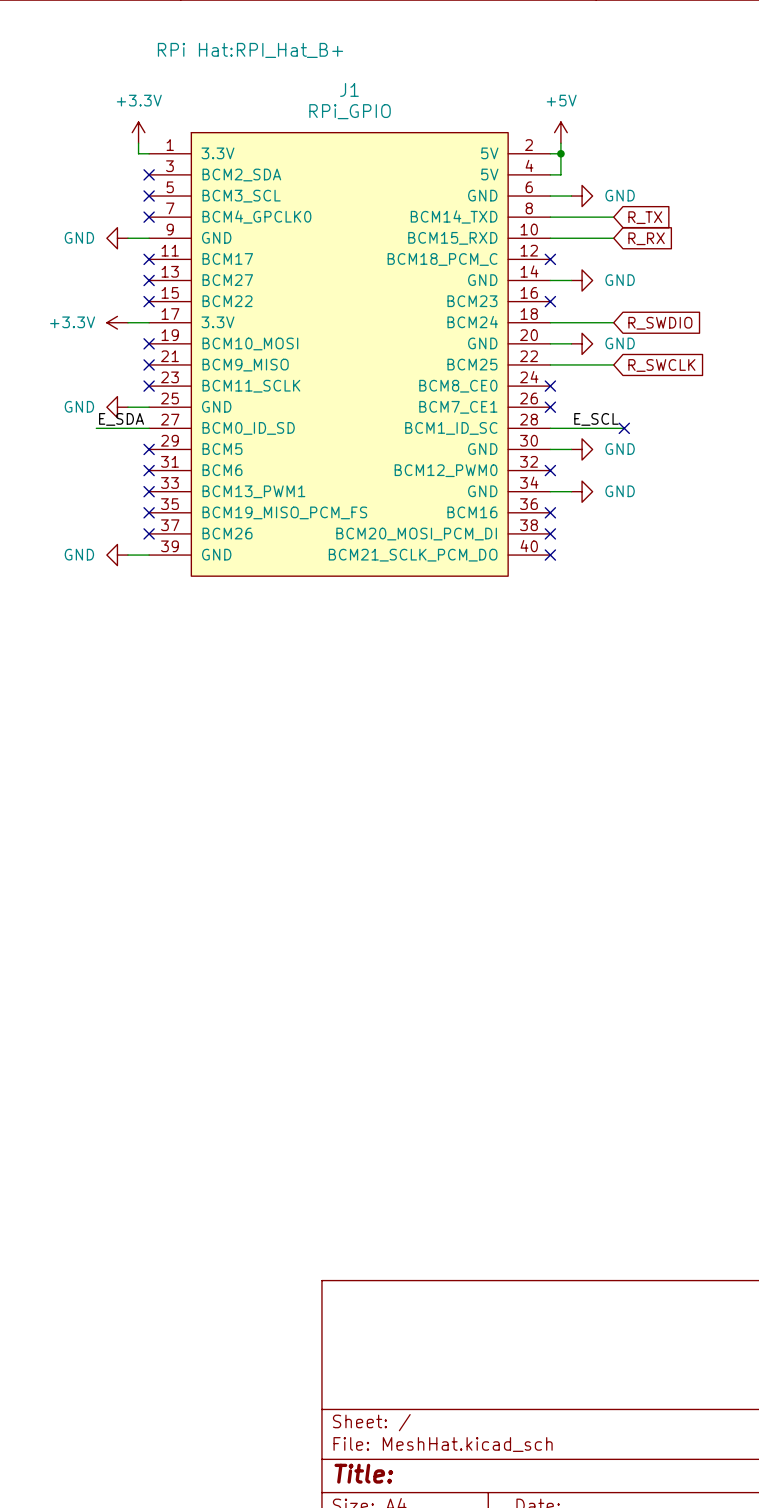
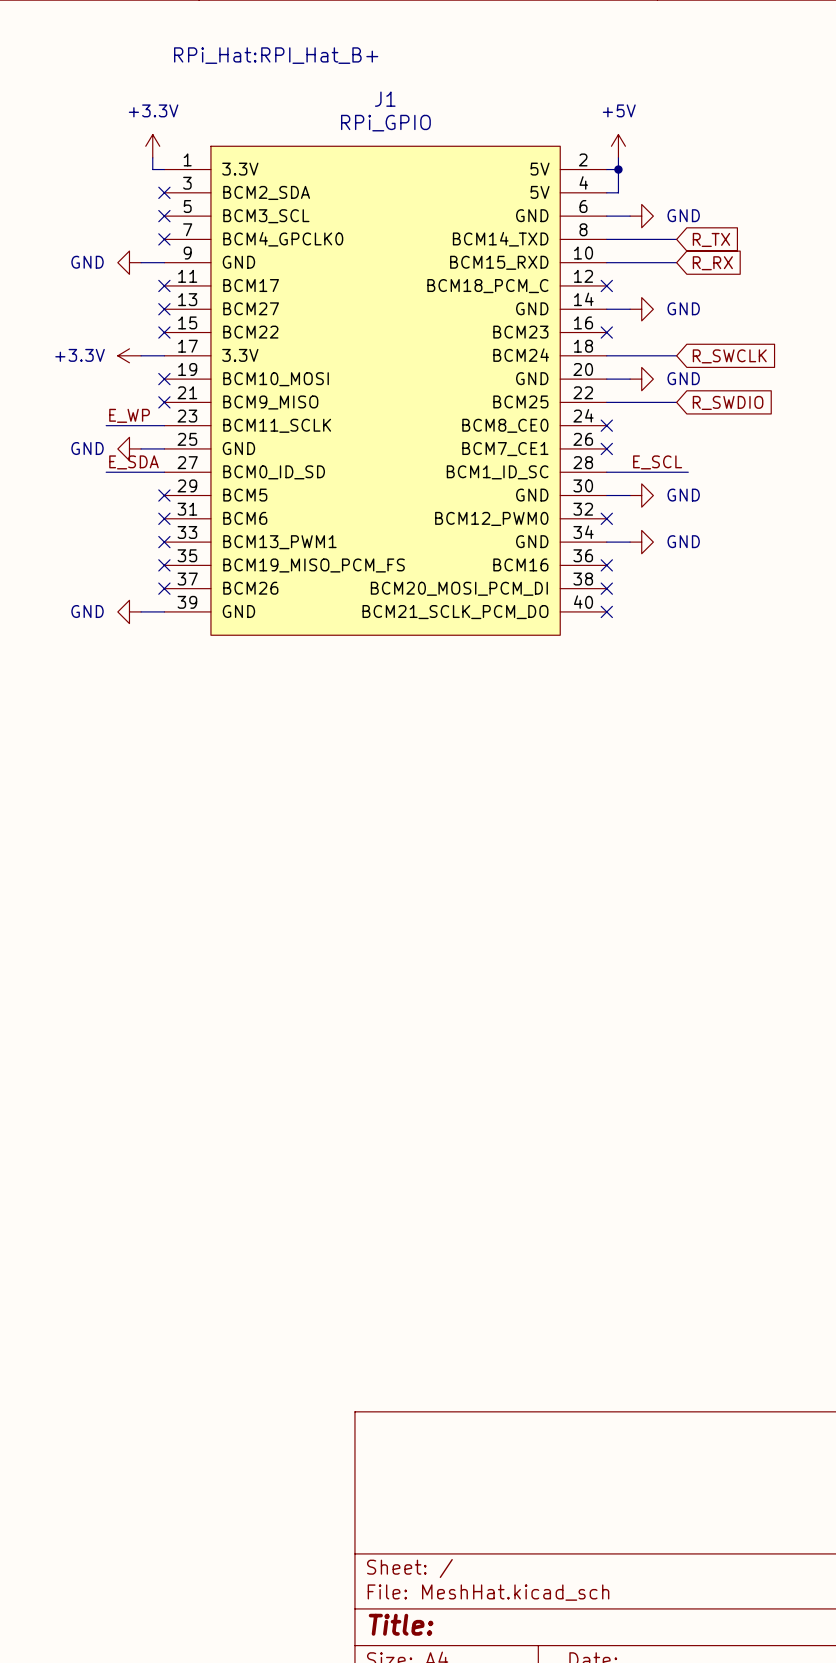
J1 text: RPi Hat:RPI_Hat_B+ (250, 50) -> RPi_Hat:RPI_Hat_B+ (276, 55)
global label: R_SWDIO (660, 323) -> R_SWCLK (729, 356)
global label: R_SWCLK (661, 365) -> R_SWDIO (728, 402)
label: none -> E_WP (129, 415)
wire: none -> (106, 425) (164, 425)
no-connect mark: (149, 386) -> none
no-connect mark: (624, 428) -> none

